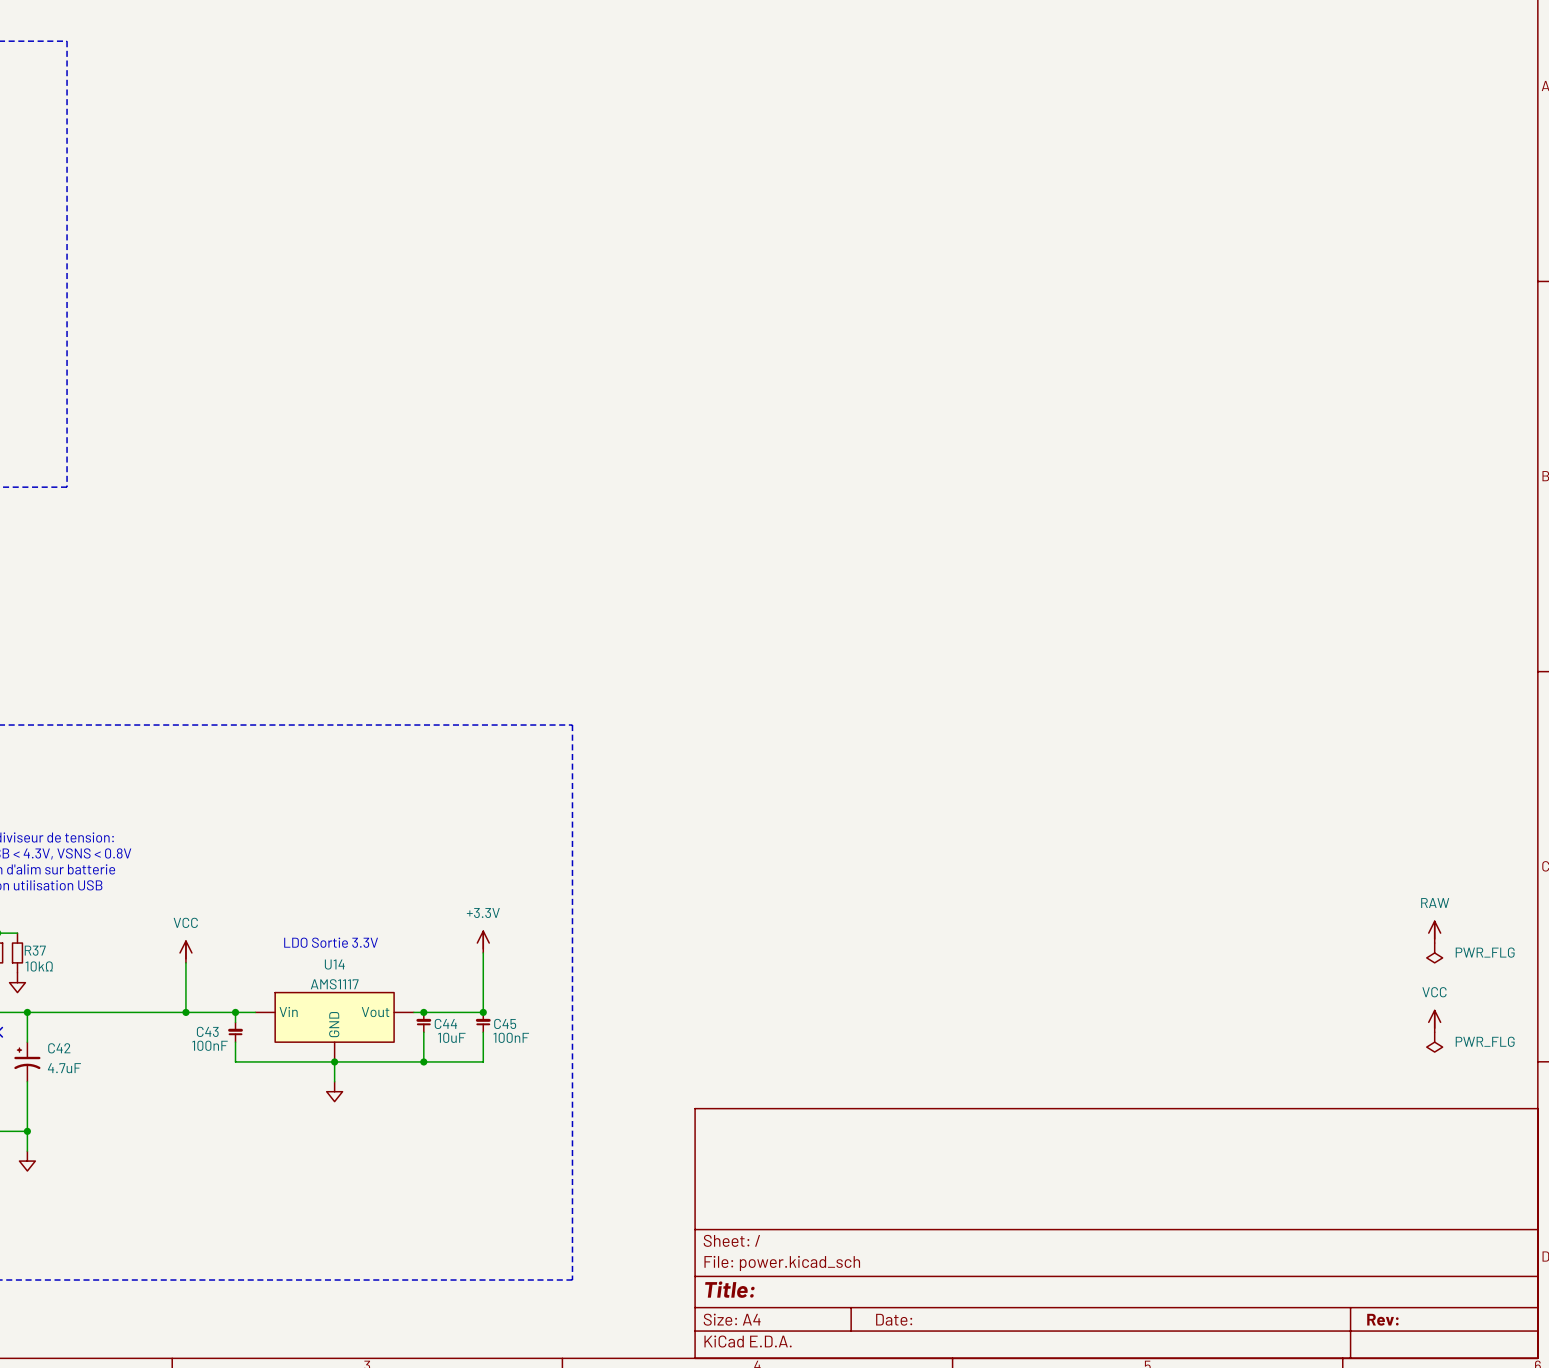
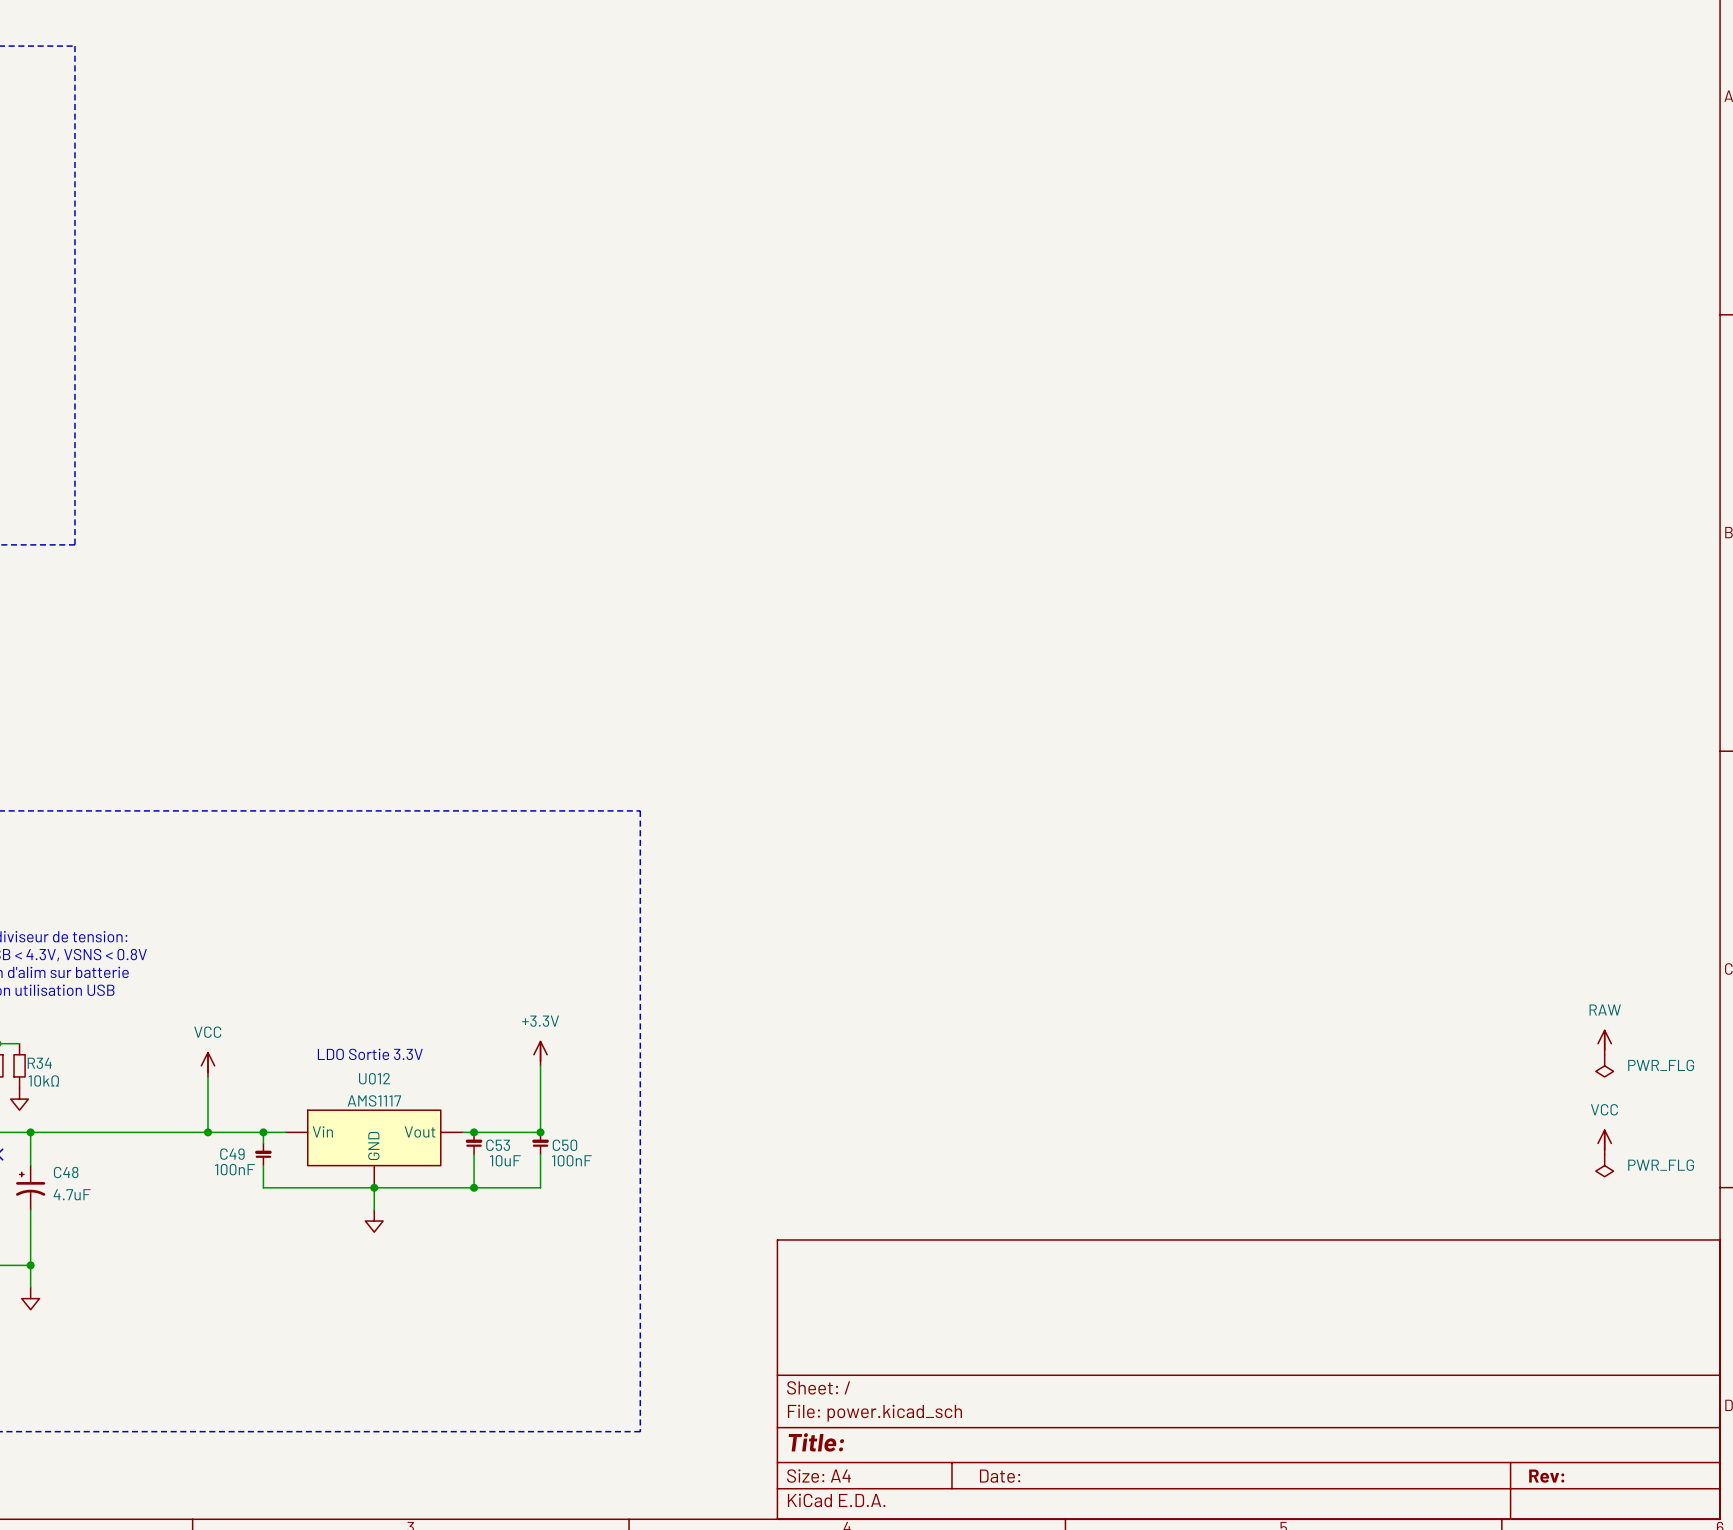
R37 name: R37 (35, 950) -> R34 (39, 1063)
U14 name: U14 (334, 964) -> U012 (374, 1078)
C44 name: C44 (445, 1023) -> C53 (498, 1145)
C45 name: C45 (505, 1023) -> C50 (564, 1145)
C43 name: C43 (207, 1031) -> C49 (232, 1154)
C42 name: C42 (59, 1048) -> C48 (66, 1172)

